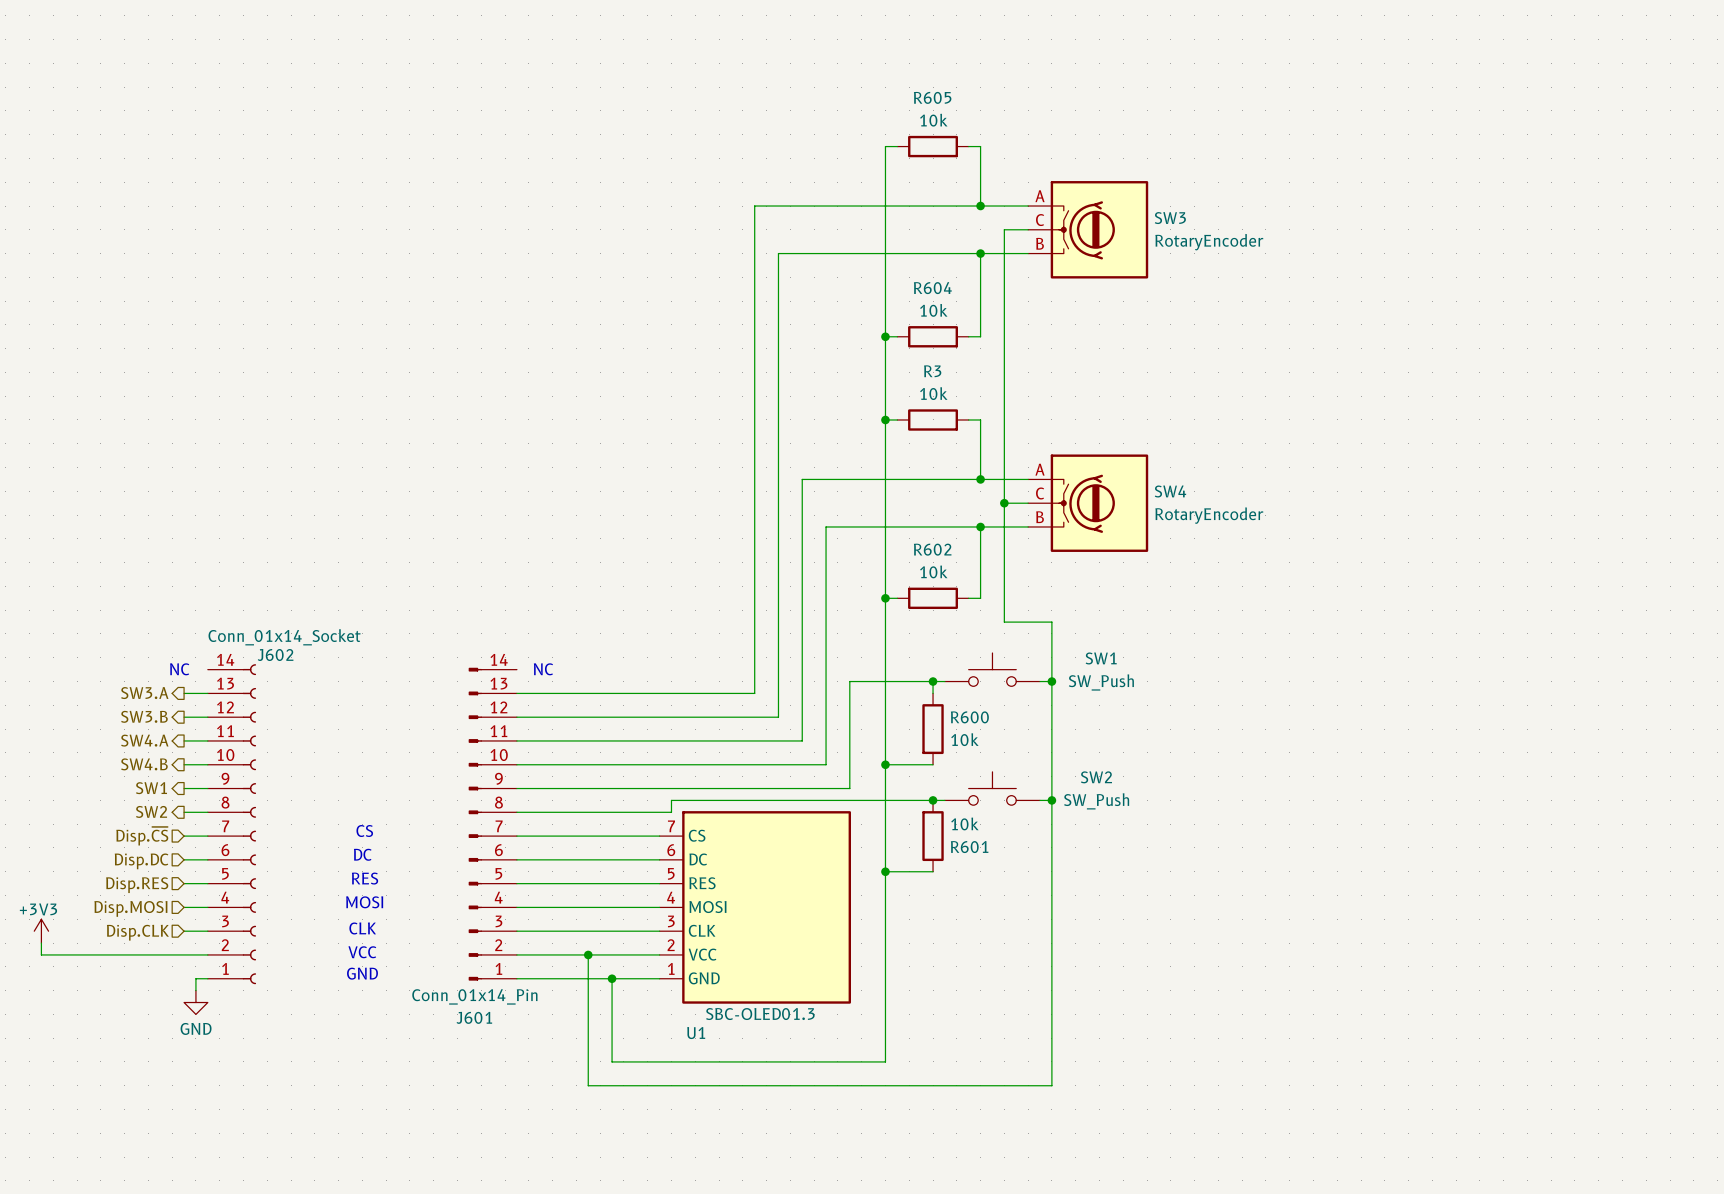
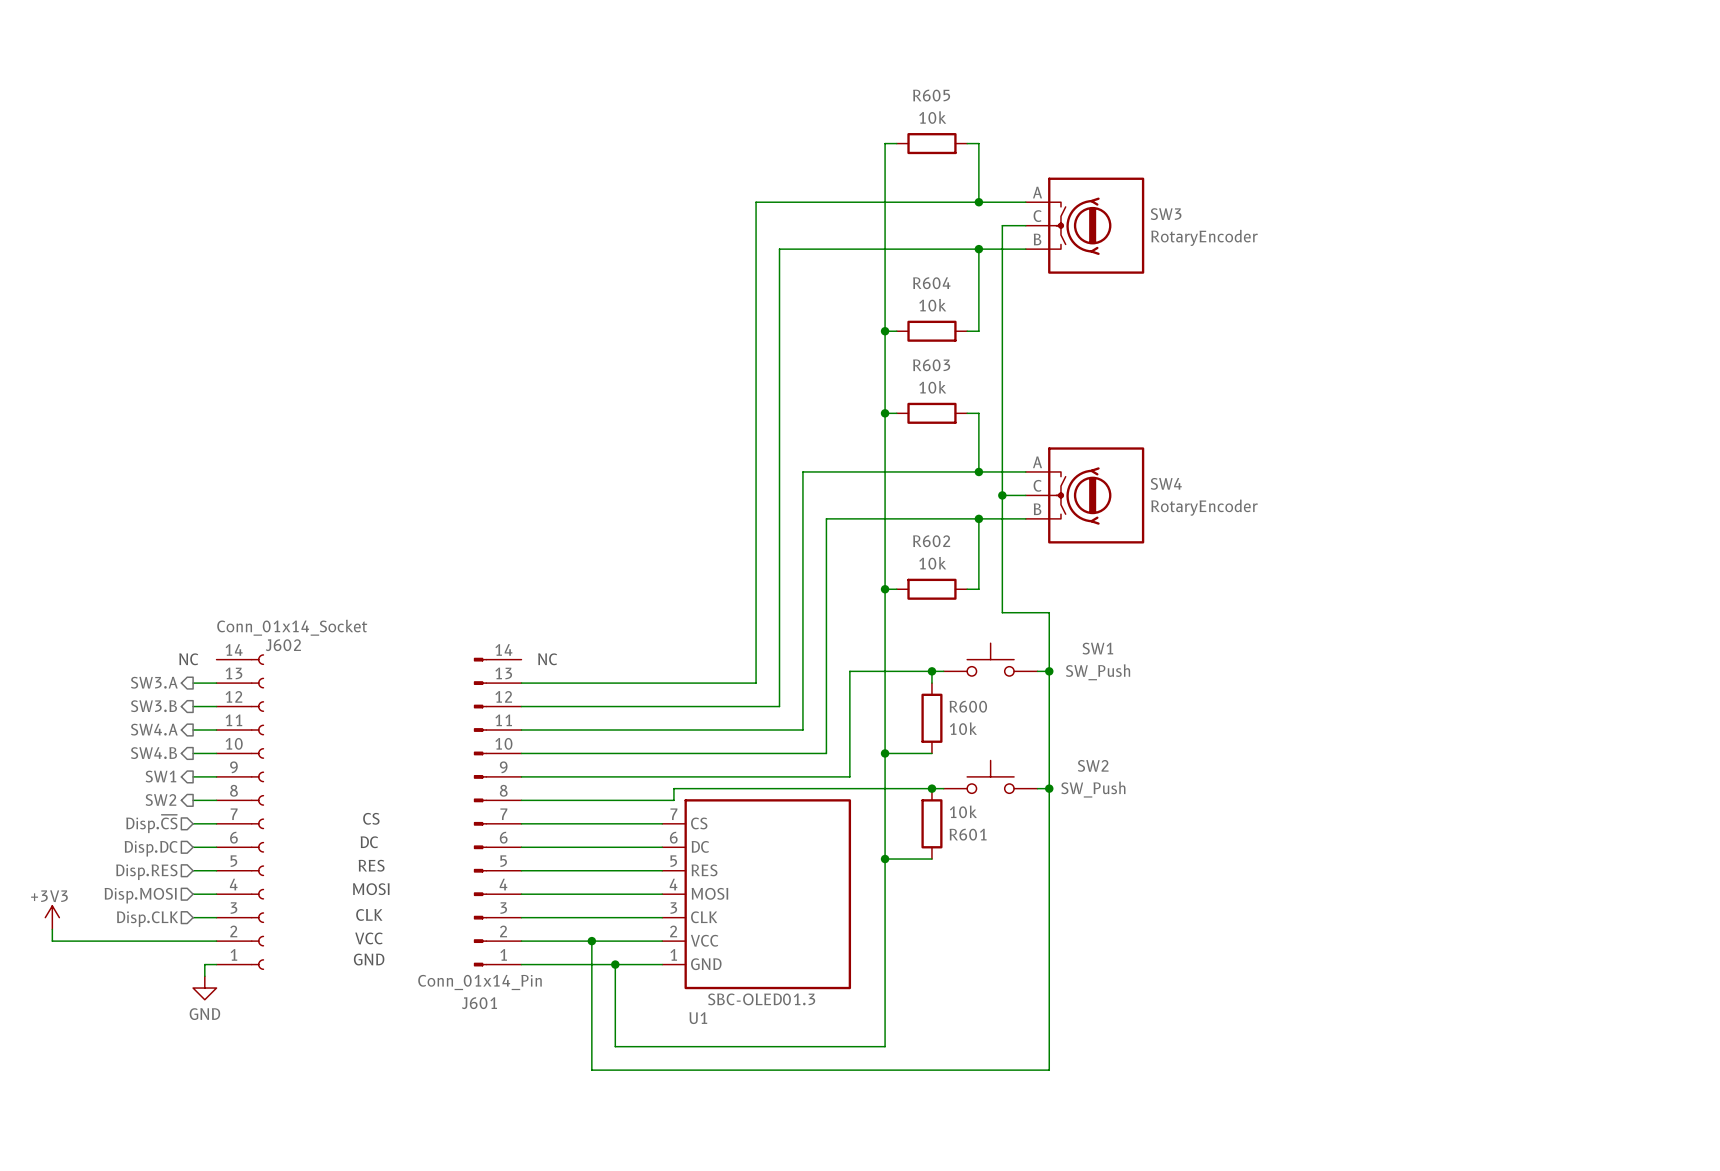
R3 name: R3 (932, 371) -> R603 (931, 365)

